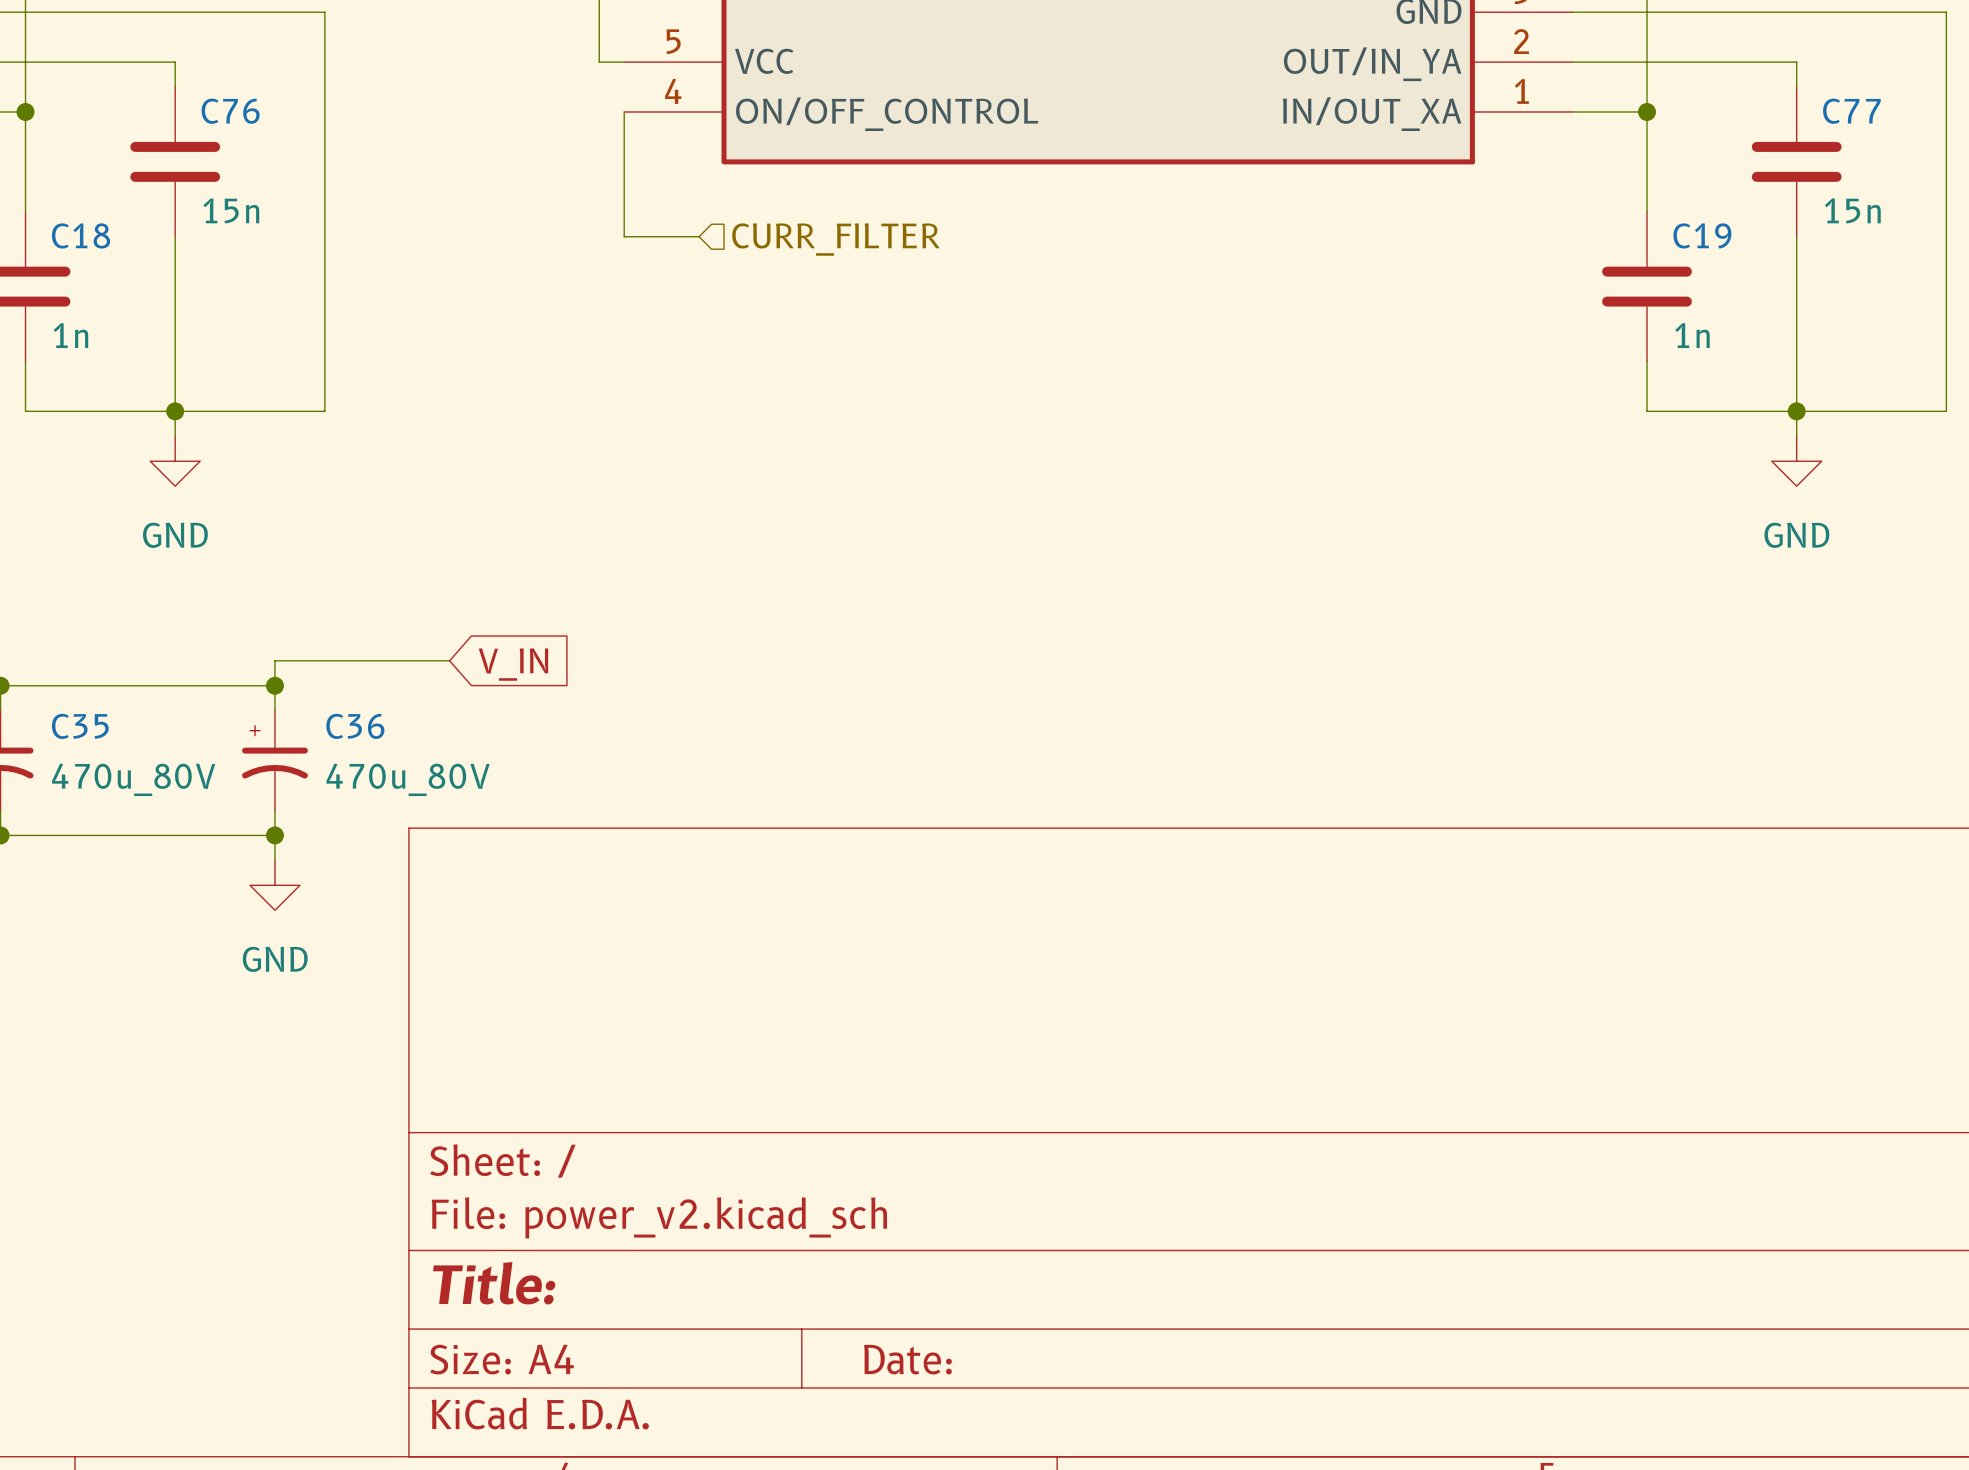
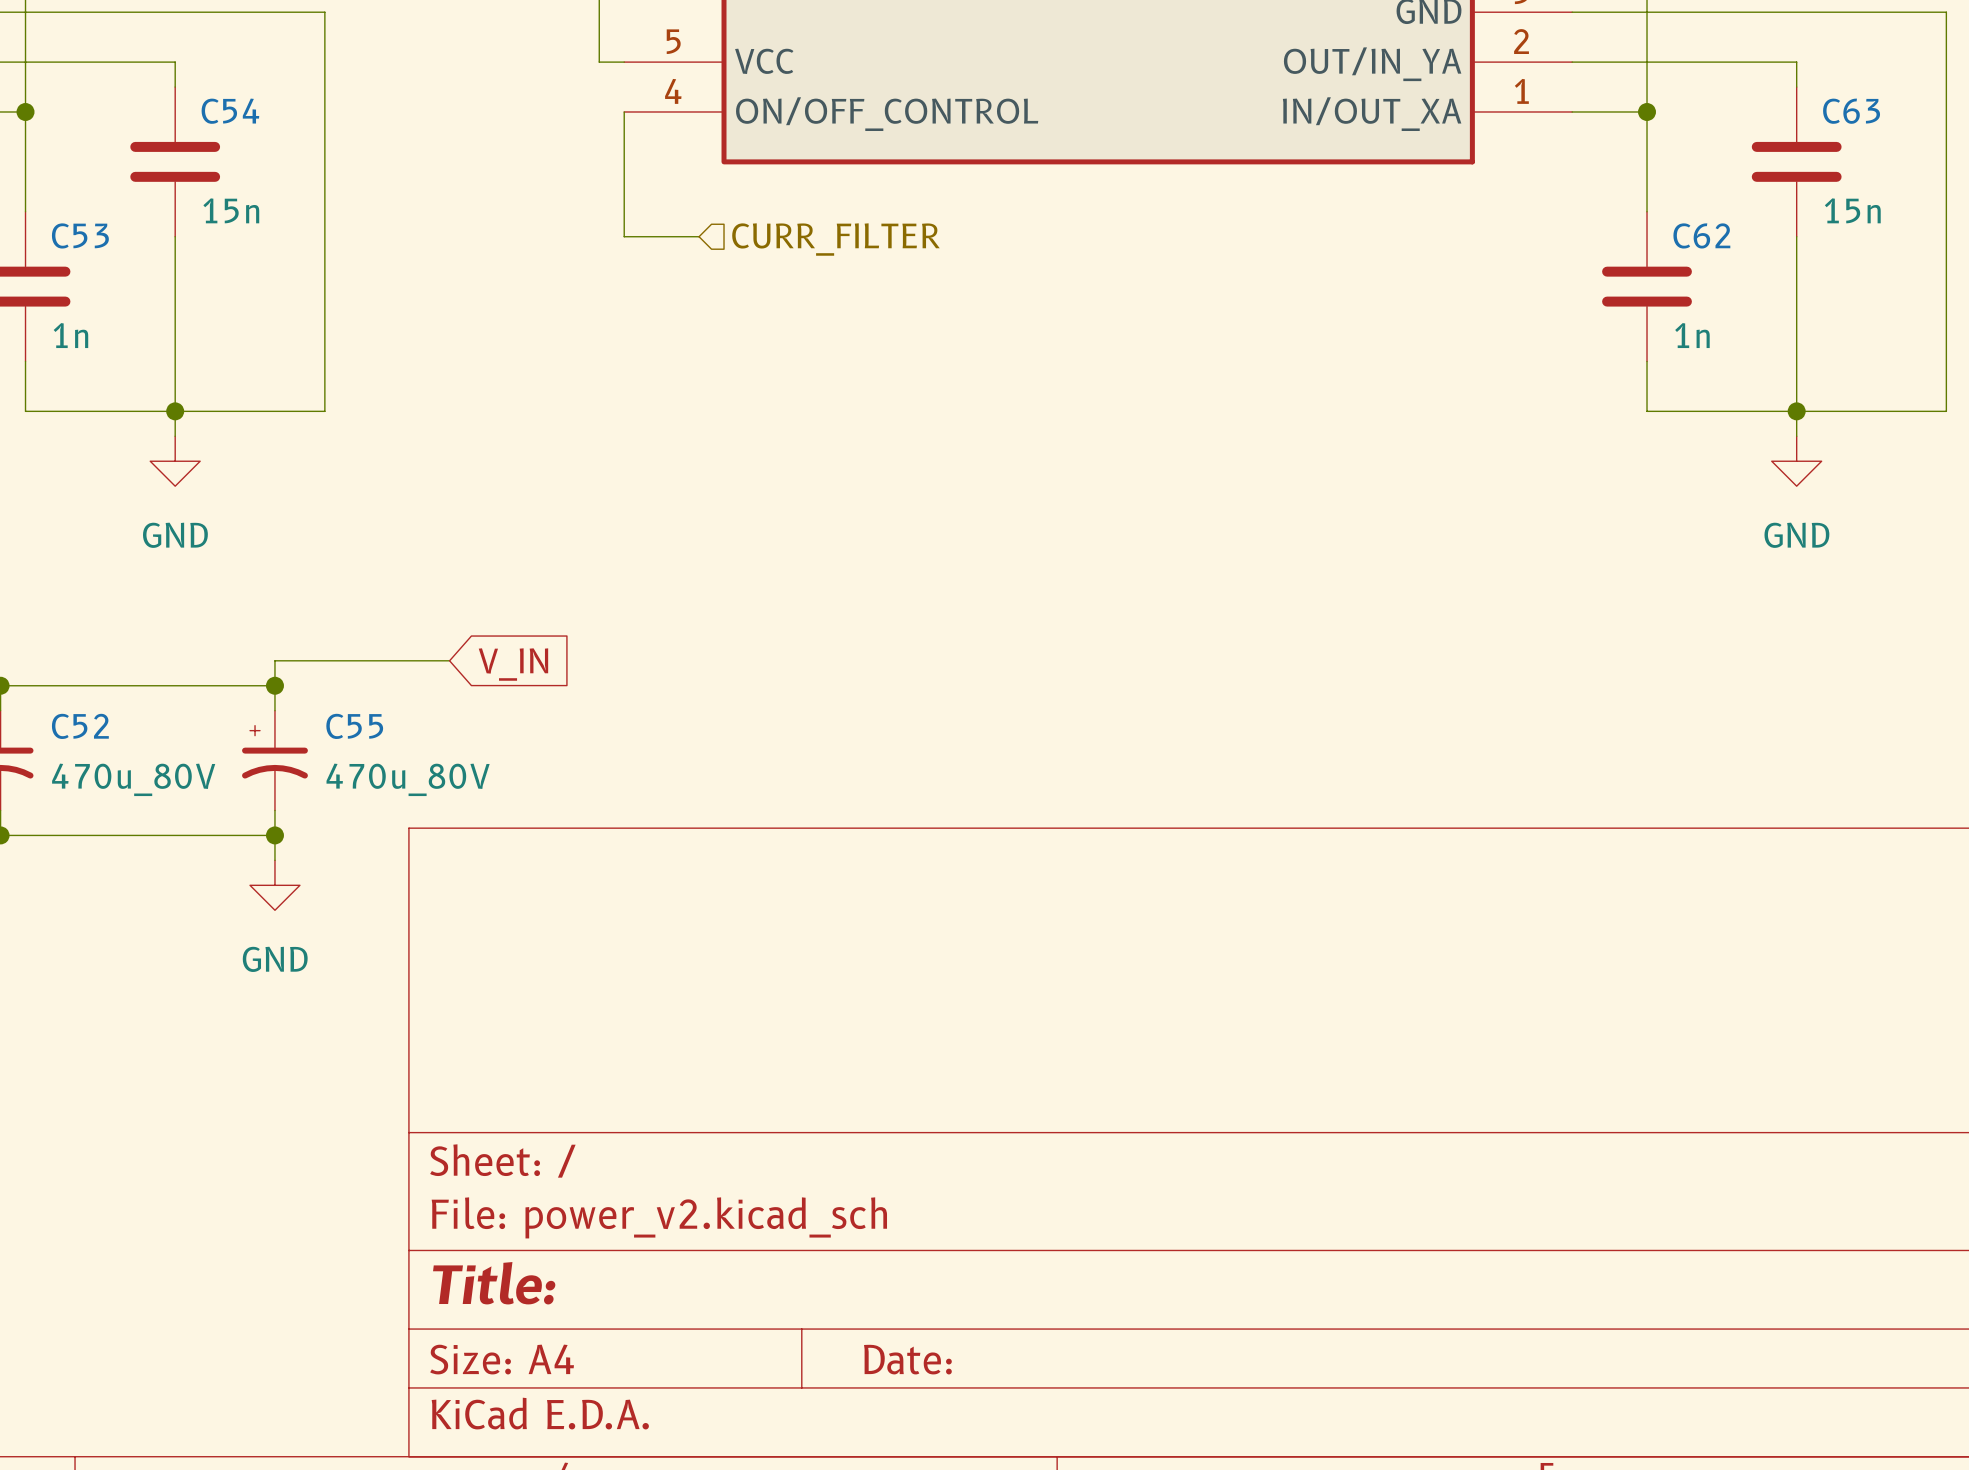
C76 name: C76 (230, 111) -> C54 (230, 111)
C77 name: C77 (1851, 111) -> C63 (1851, 111)
C18 name: C18 (81, 235) -> C53 (80, 235)
C19 name: C19 (1702, 235) -> C62 (1701, 235)
C35 name: C35 (80, 726) -> C52 (80, 726)
C36 name: C36 (355, 726) -> C55 (354, 726)

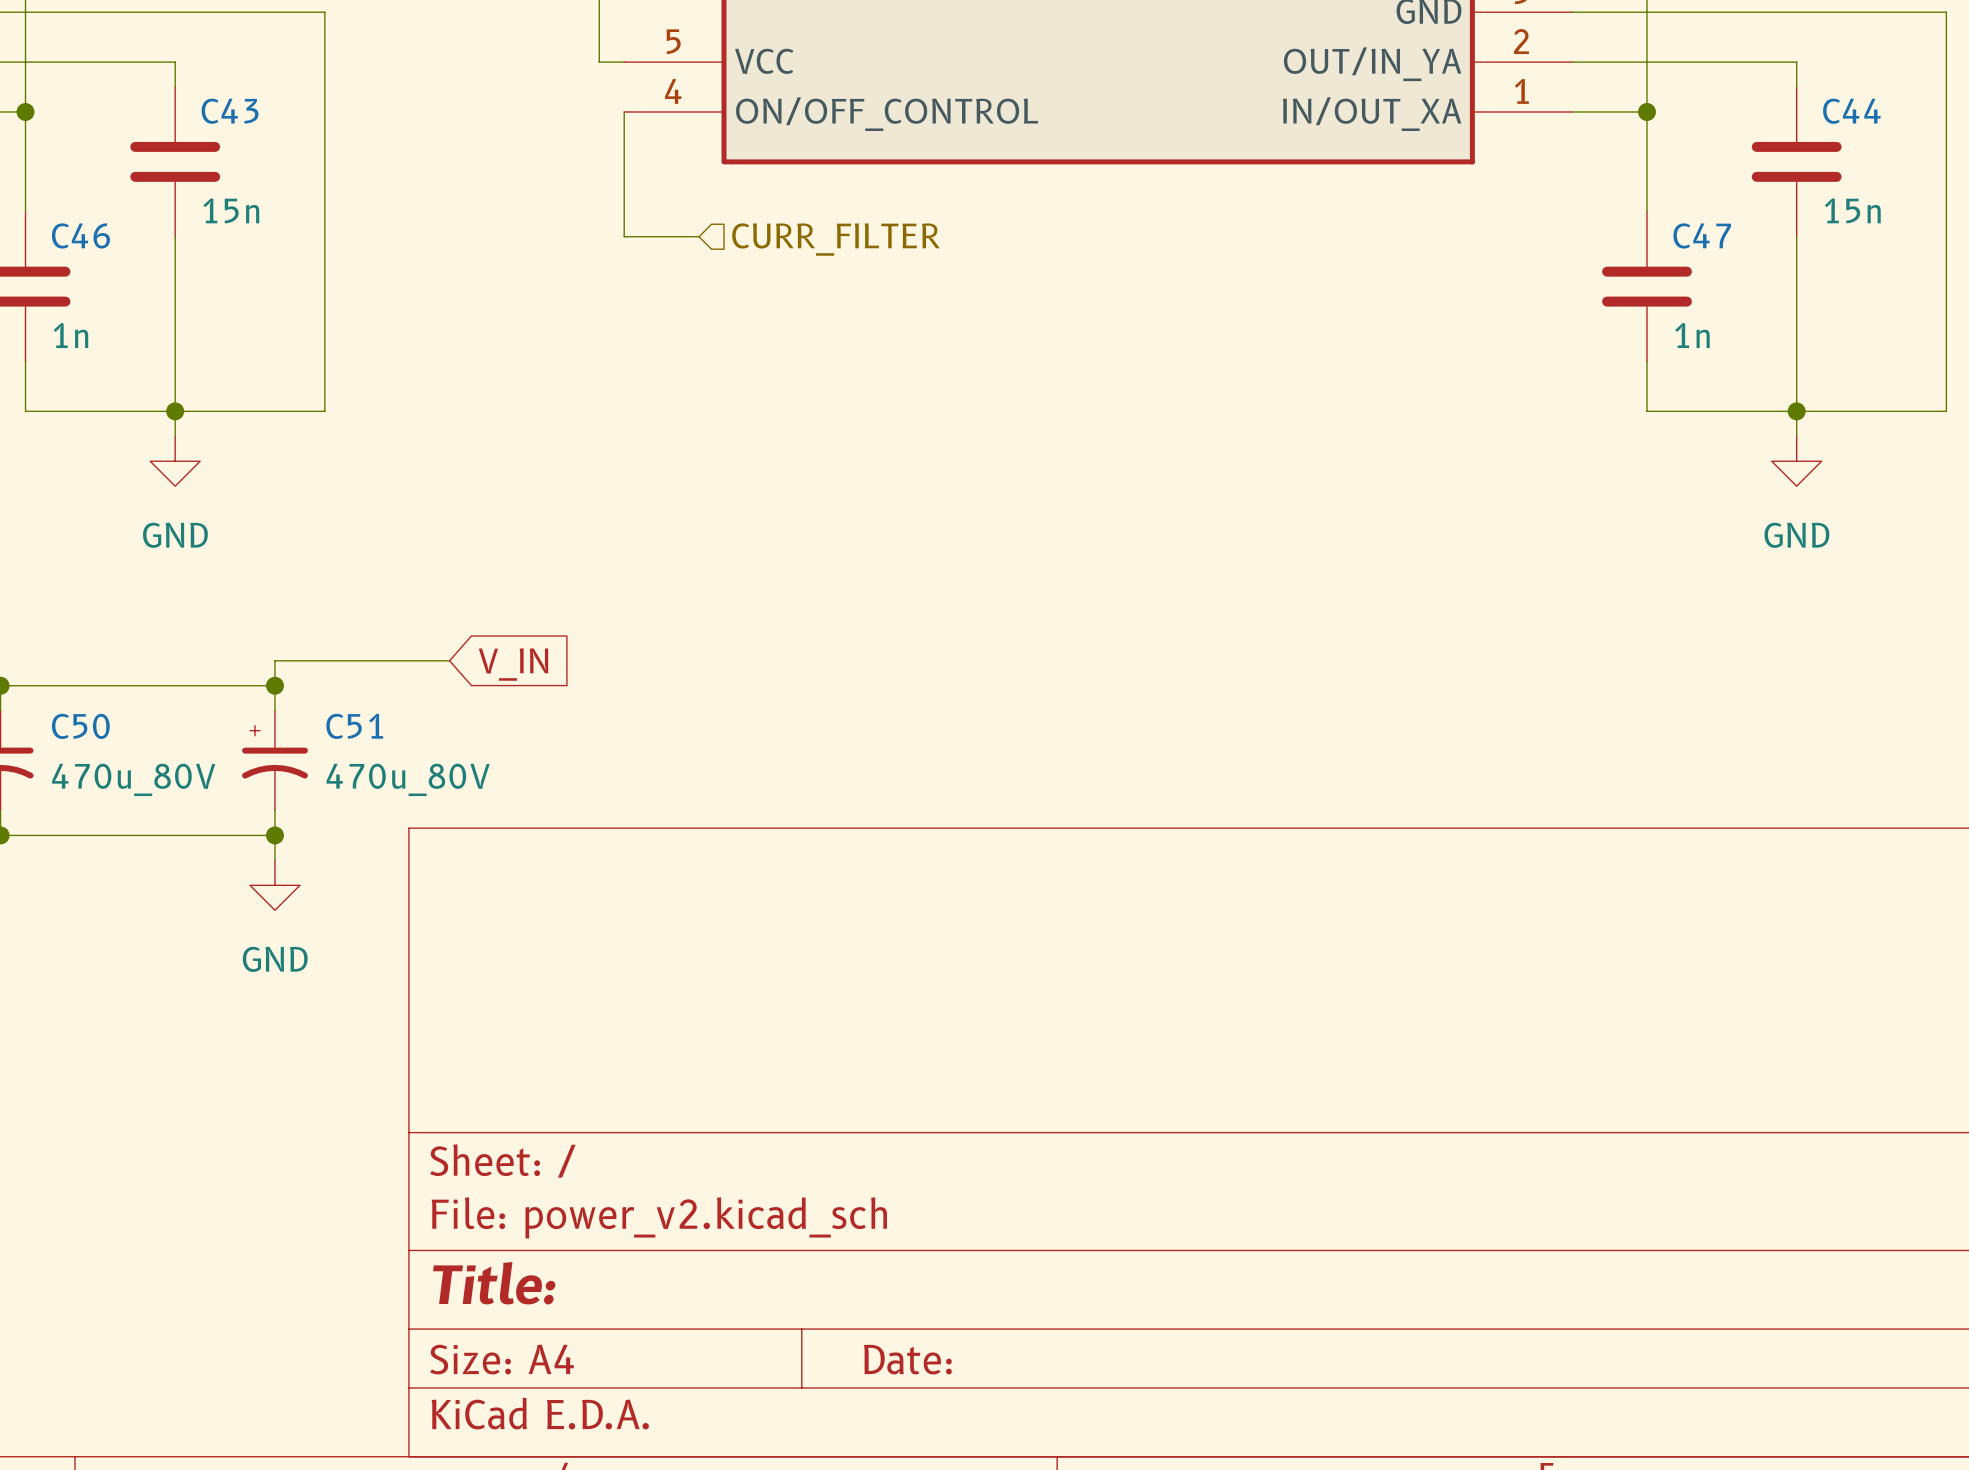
C54 name: C54 (230, 111) -> C43 (230, 111)
C63 name: C63 (1851, 111) -> C44 (1851, 111)
C53 name: C53 (80, 235) -> C46 (80, 235)
C62 name: C62 (1701, 235) -> C47 (1702, 235)
C52 name: C52 (80, 726) -> C50 (80, 726)
C55 name: C55 (354, 726) -> C51 (354, 726)

